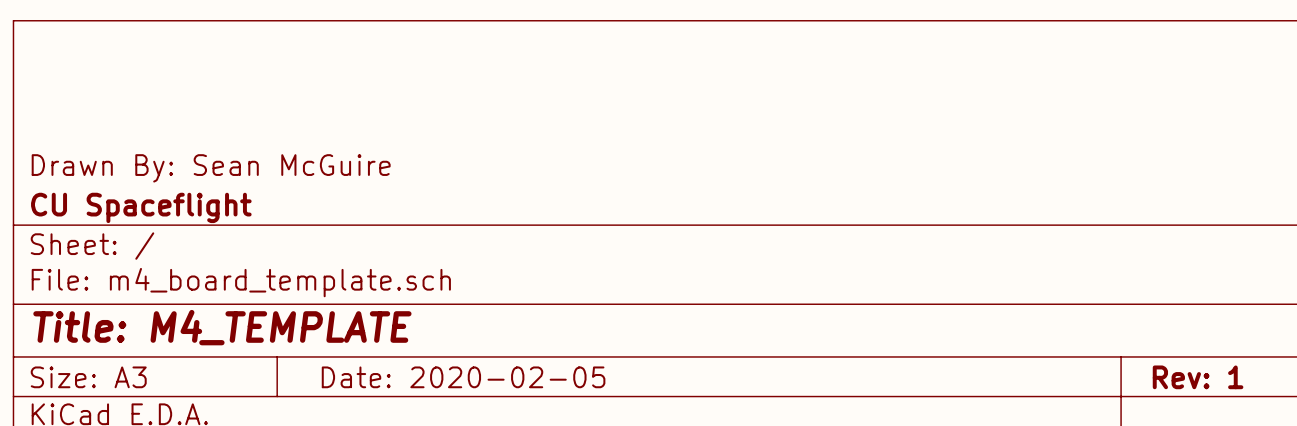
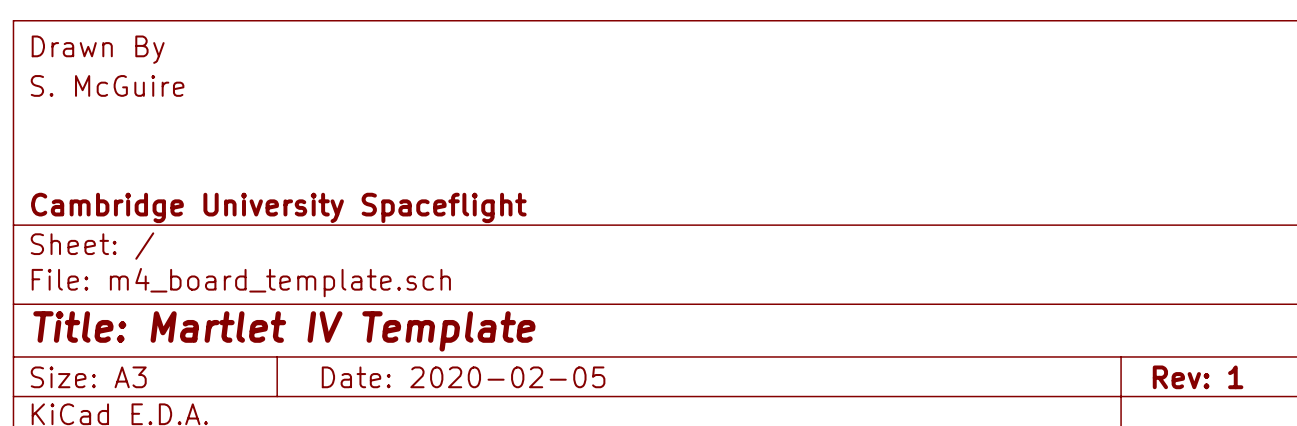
title block: none -> Drawn By (98, 49)
title block: none -> S. McGuire (107, 85)
title block: Drawn By: Sean McGuire (211, 168) -> none
title block: CU Spaceflight (141, 207) -> Cambridge University Spaceflight (278, 207)
title block: Title: M4_TEMPLATE (222, 327) -> Title: Martlet IV Template (284, 331)

